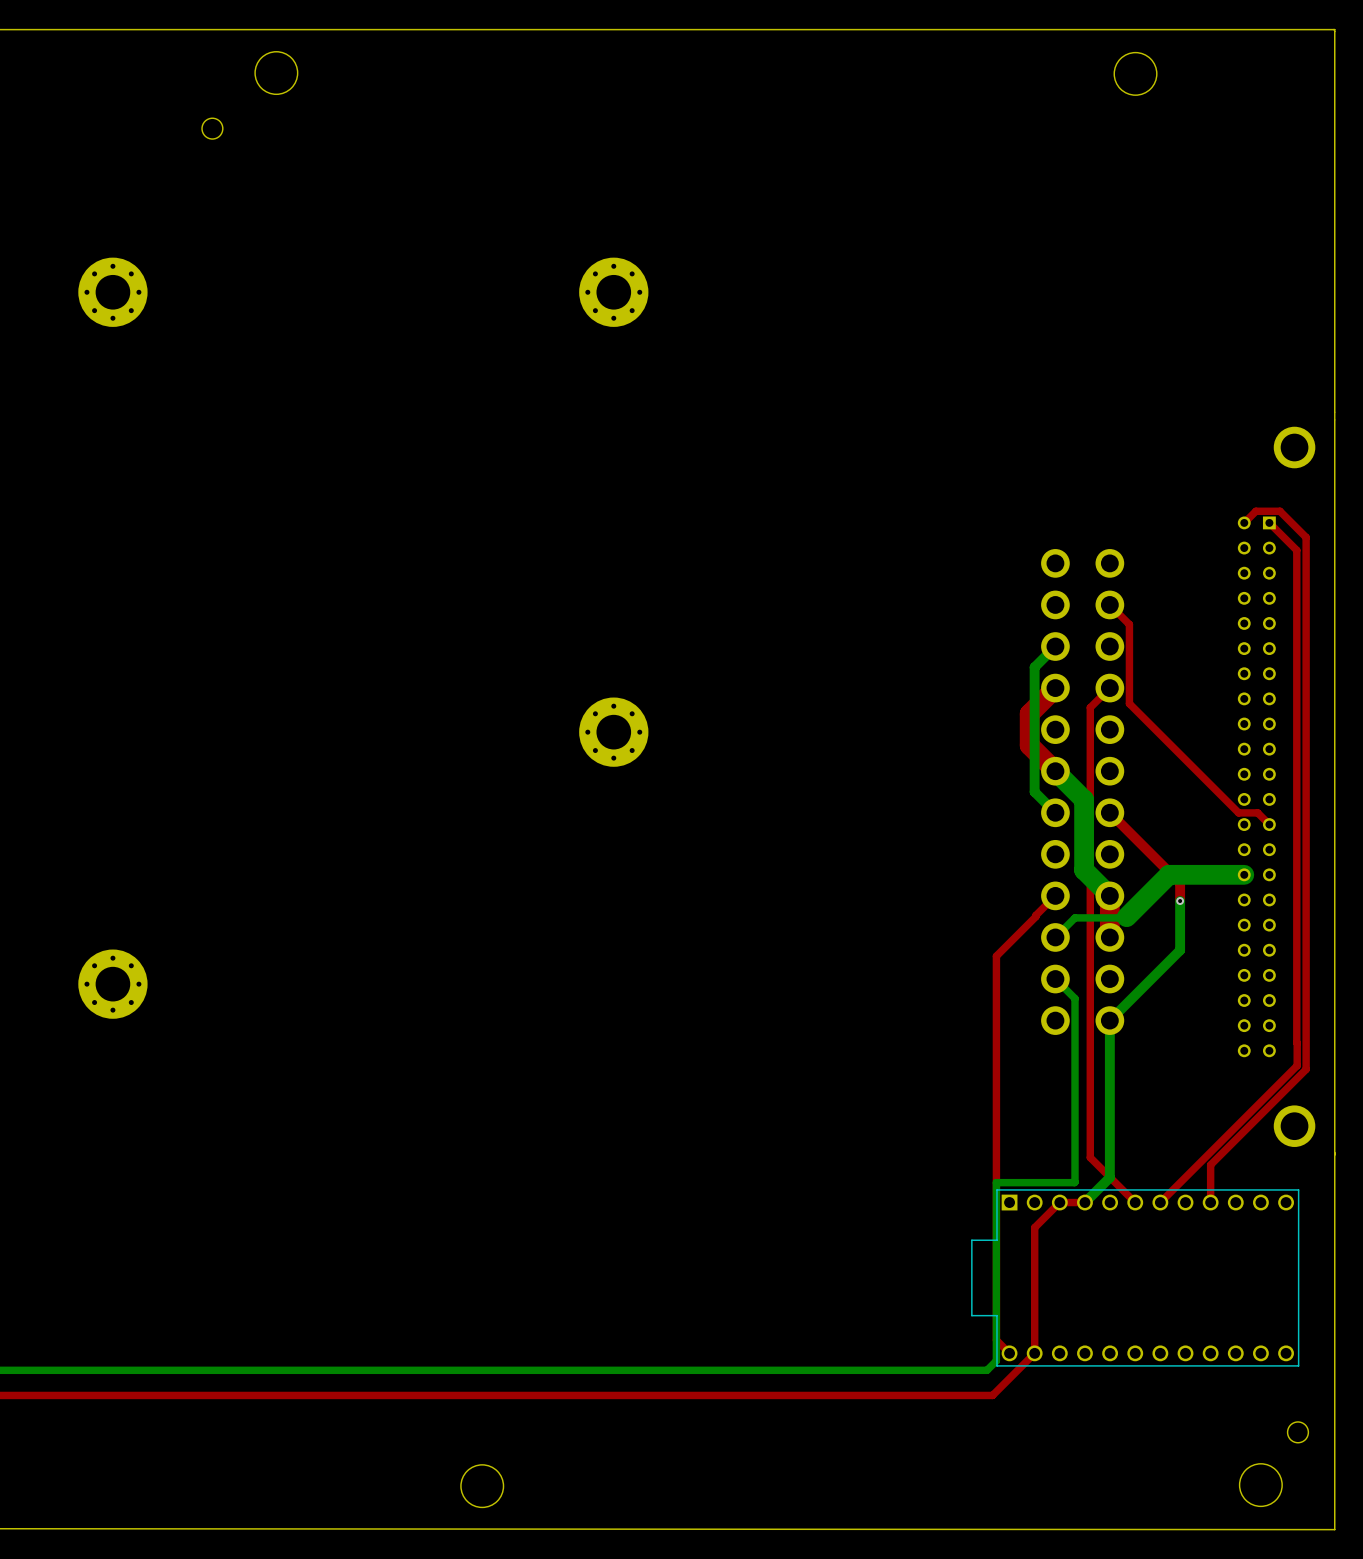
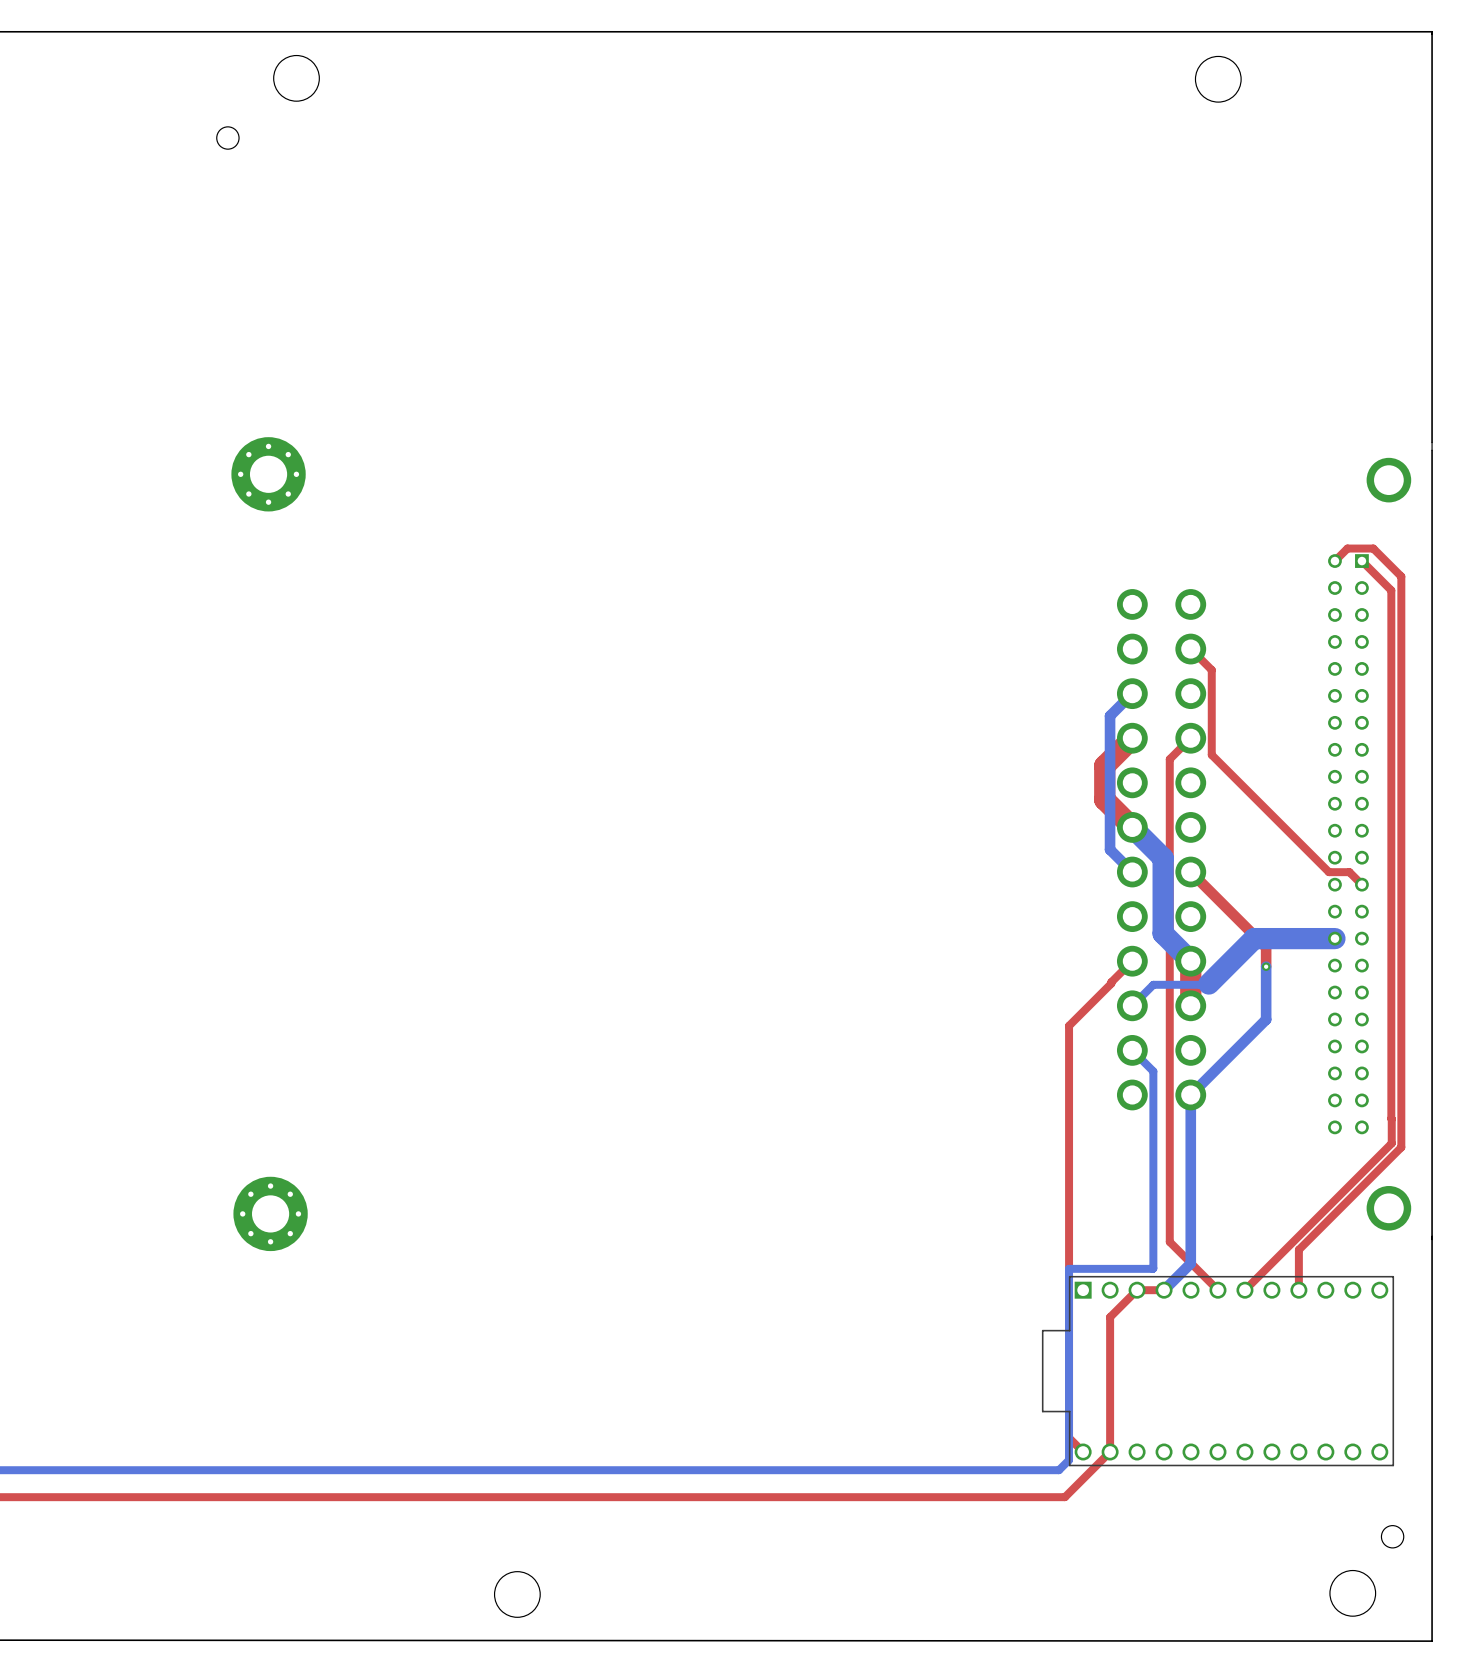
part: (112, 292) -> none
part: (613, 292) -> none
part: none -> (268, 474)
part: (613, 732) -> none
part position: (112, 984) -> (270, 1213)

